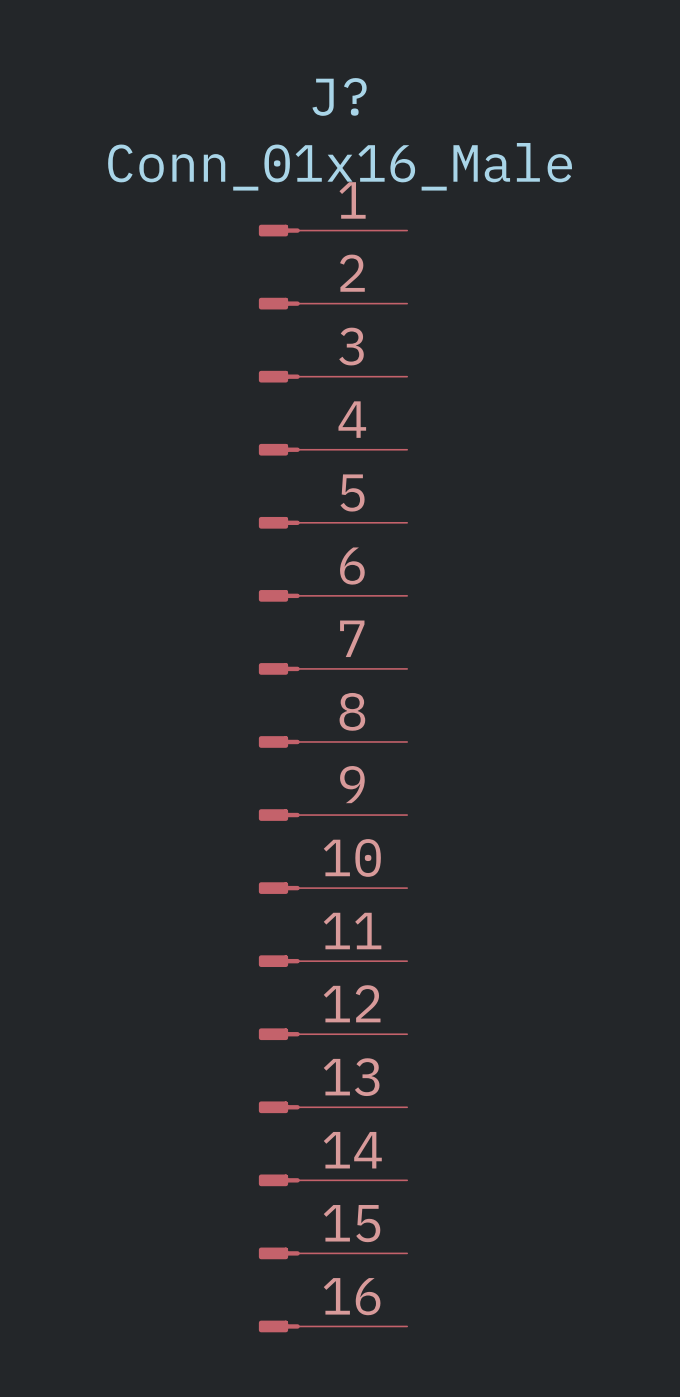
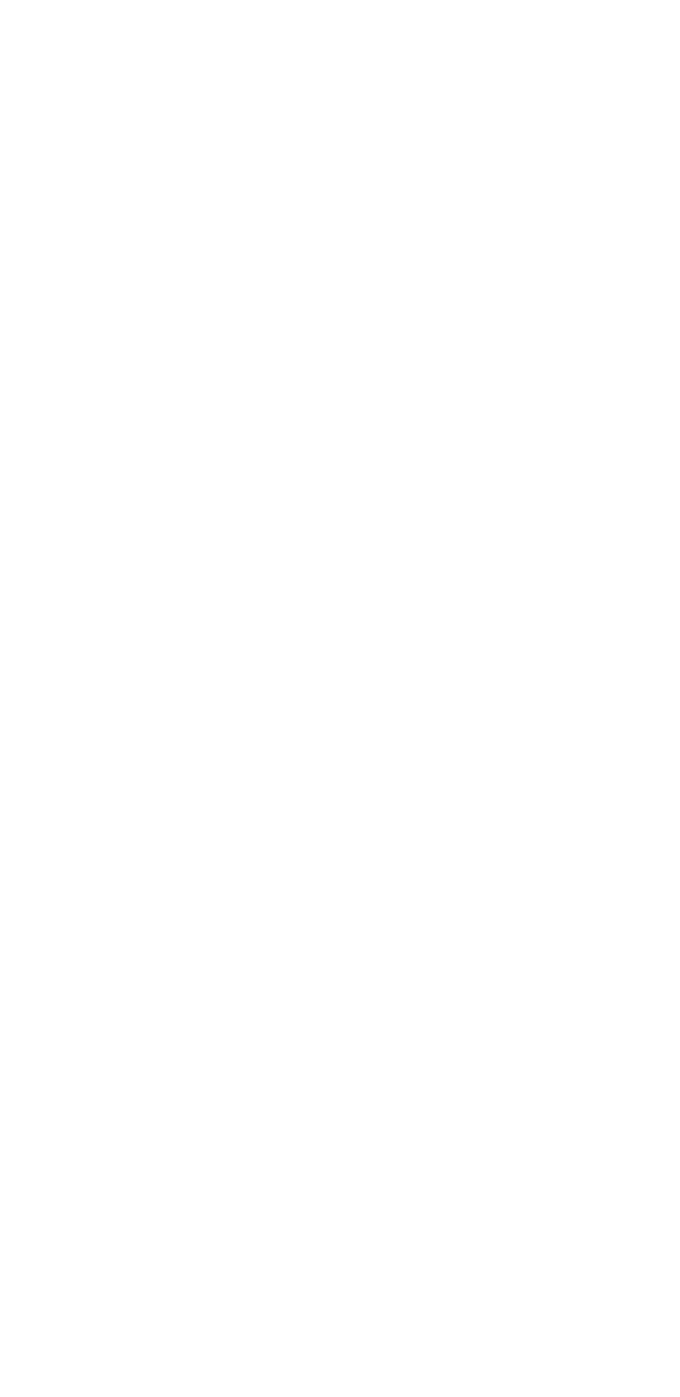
J?: Conn_01x16_Male (333, 778) -> none

